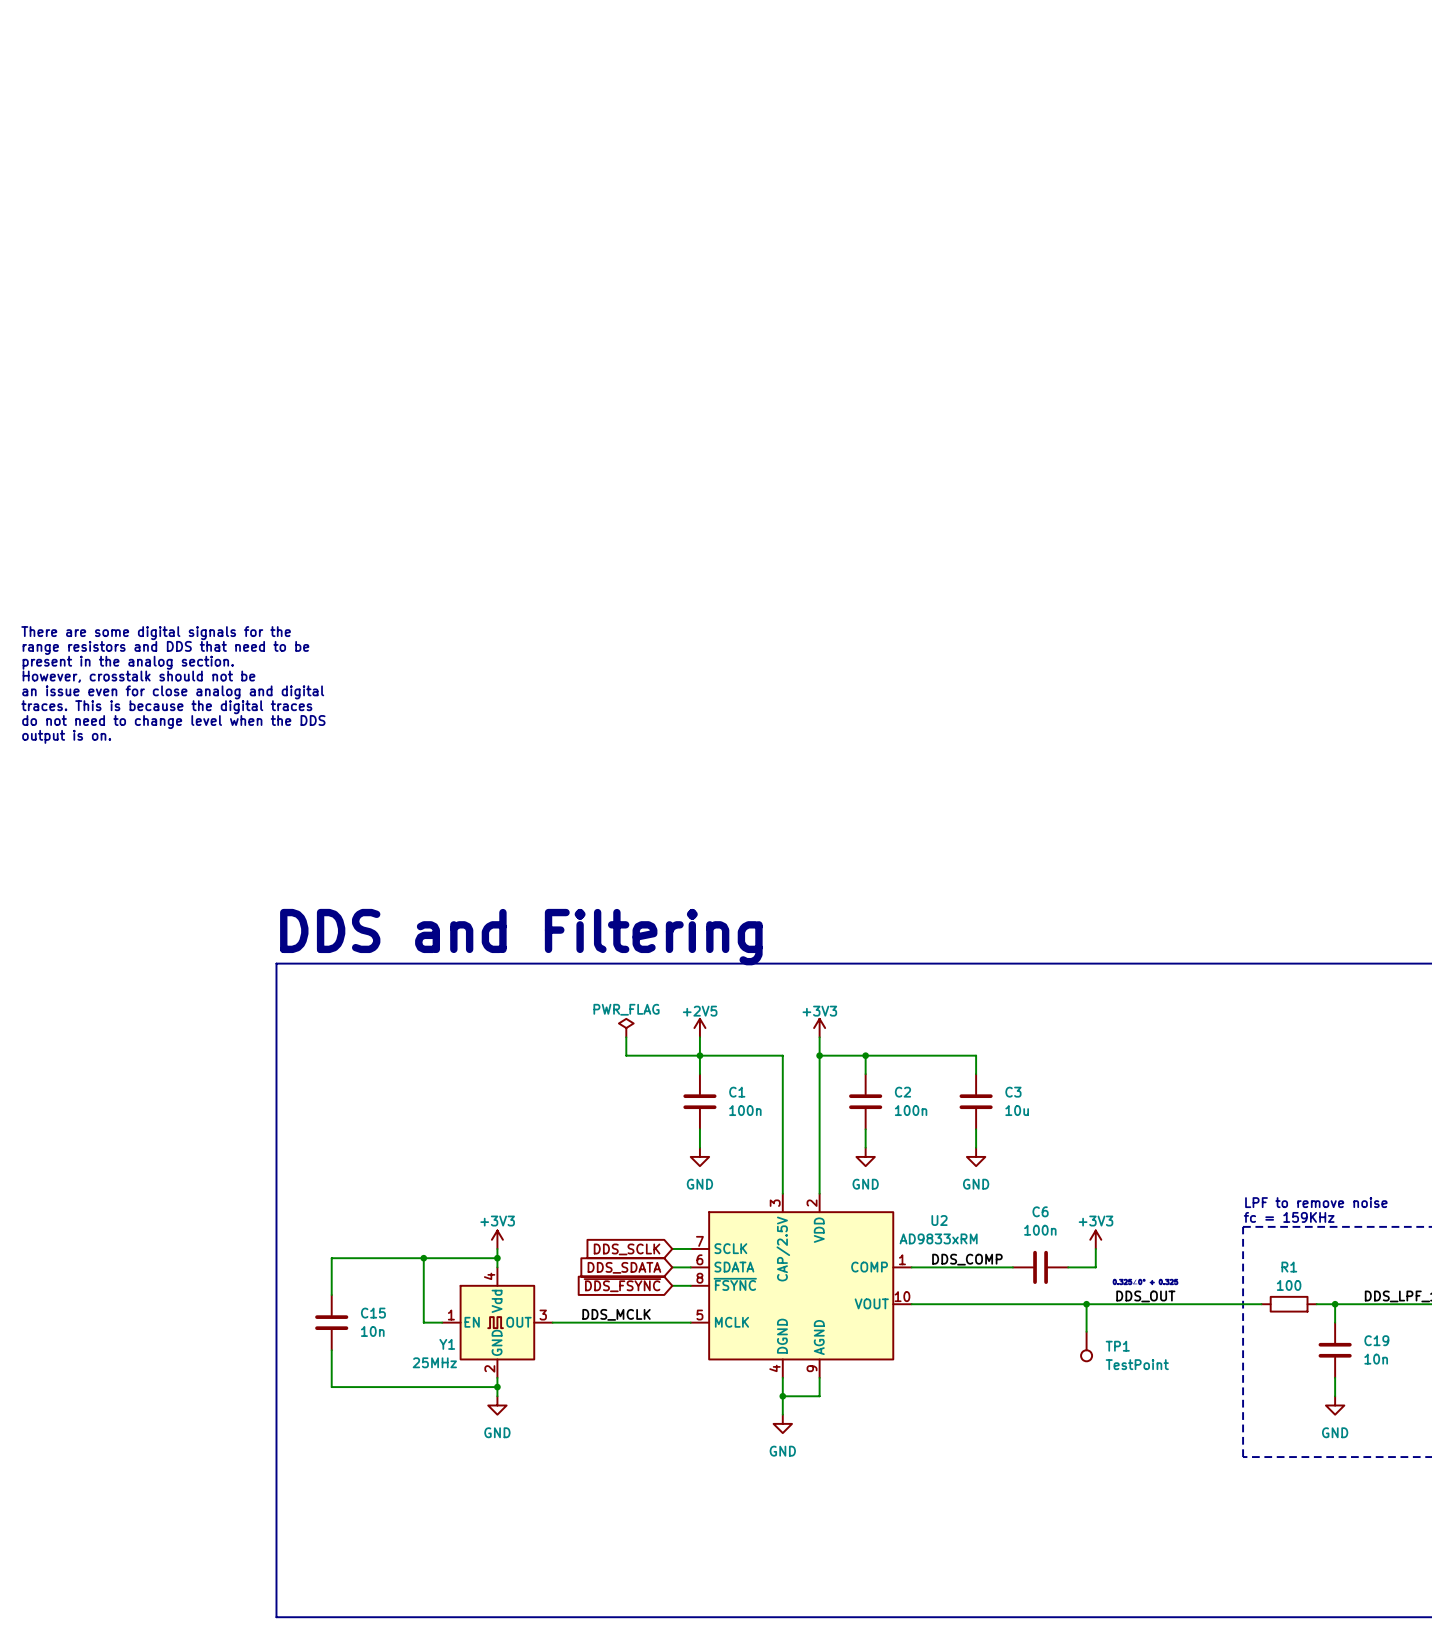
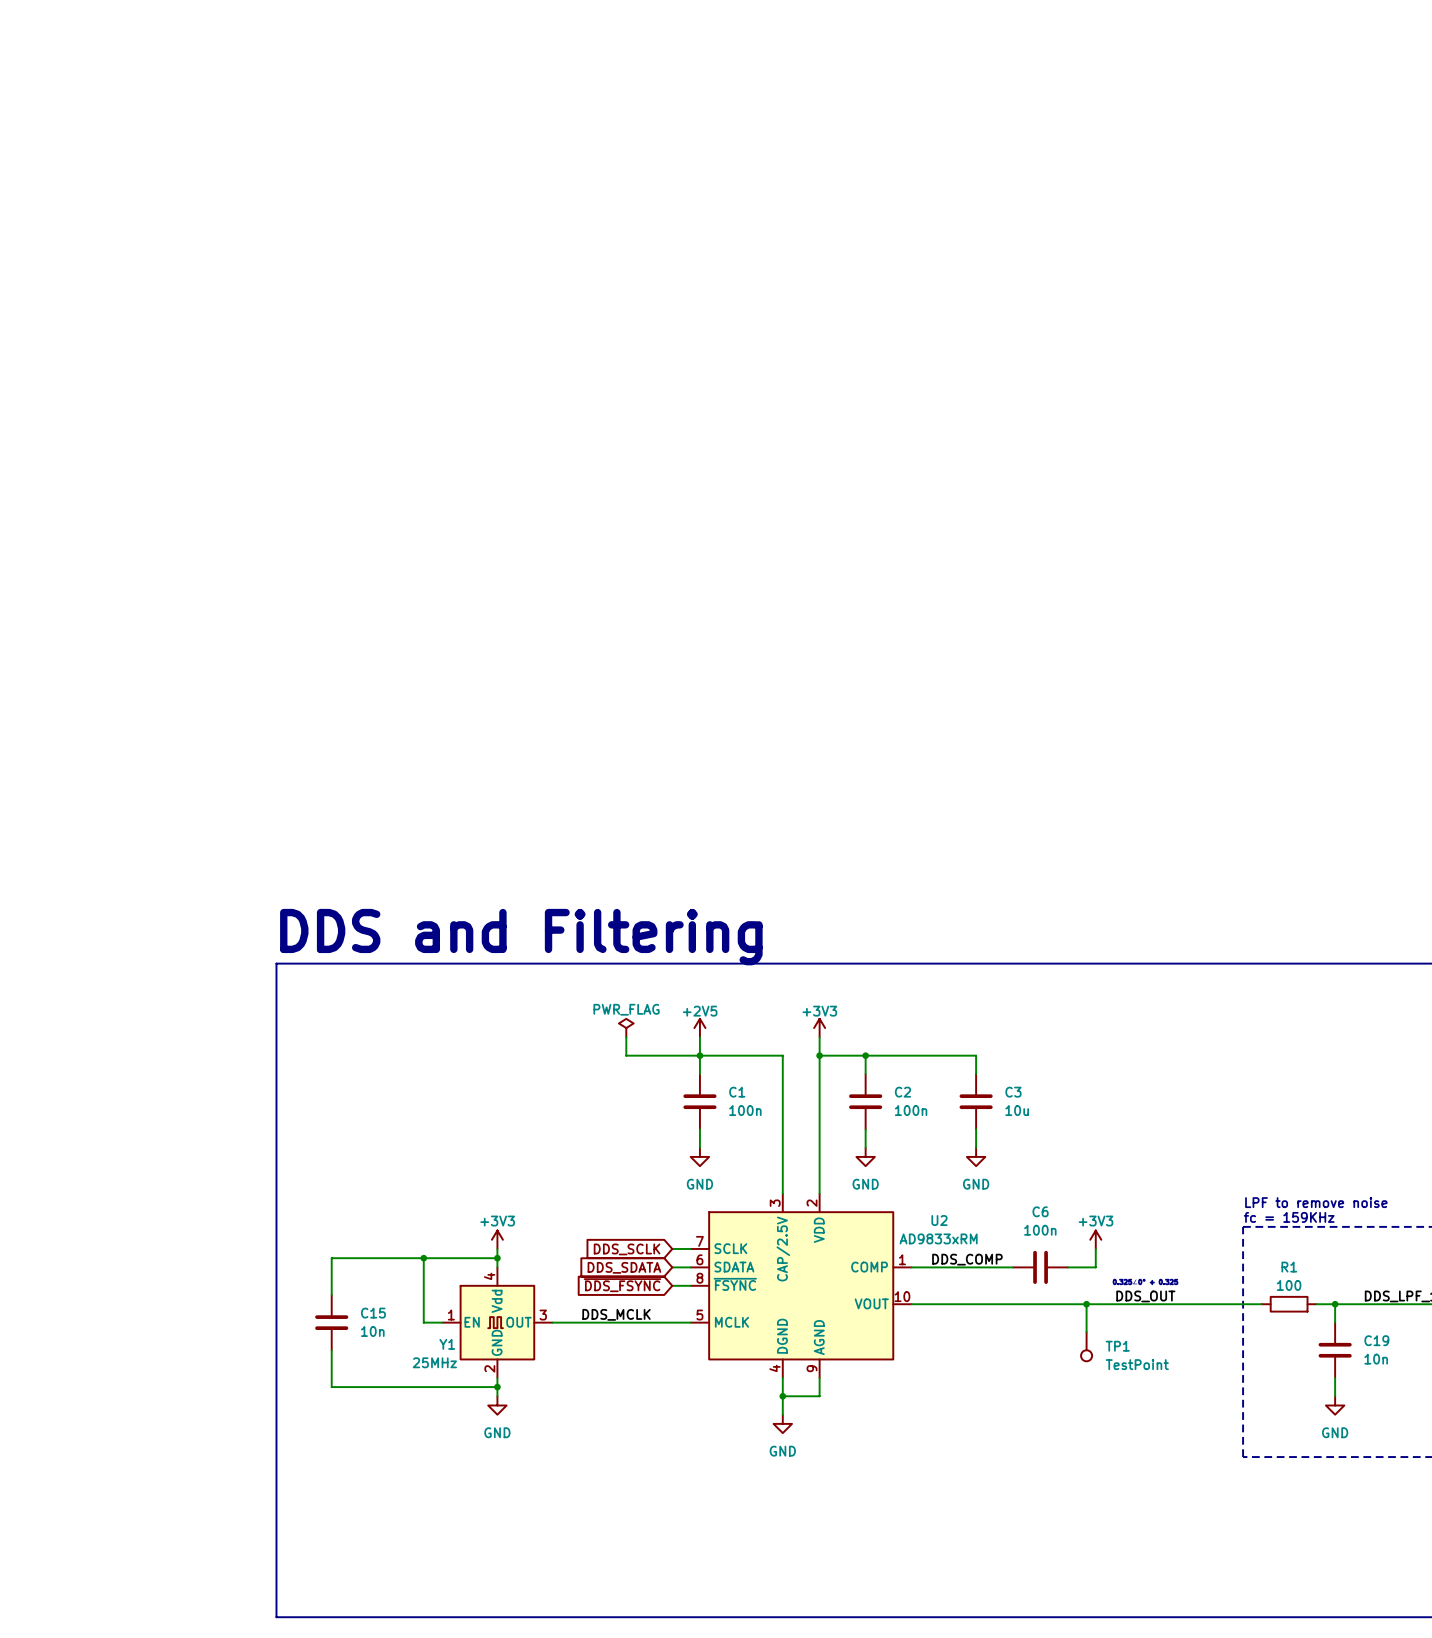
text: There are some digital signals for the (156, 633) -> none
text: range resistors and DDS that need to be (165, 647) -> none
text: present in the analog section. (128, 662) -> none
text: However, crosstalk should not be (138, 676) -> none
text: an issue even for close analog and digital (173, 692) -> none
text: traces. This is because the digital traces (166, 707) -> none
text: do not need to change level when the DDS (173, 722) -> none
text: output is on. (66, 736) -> none

